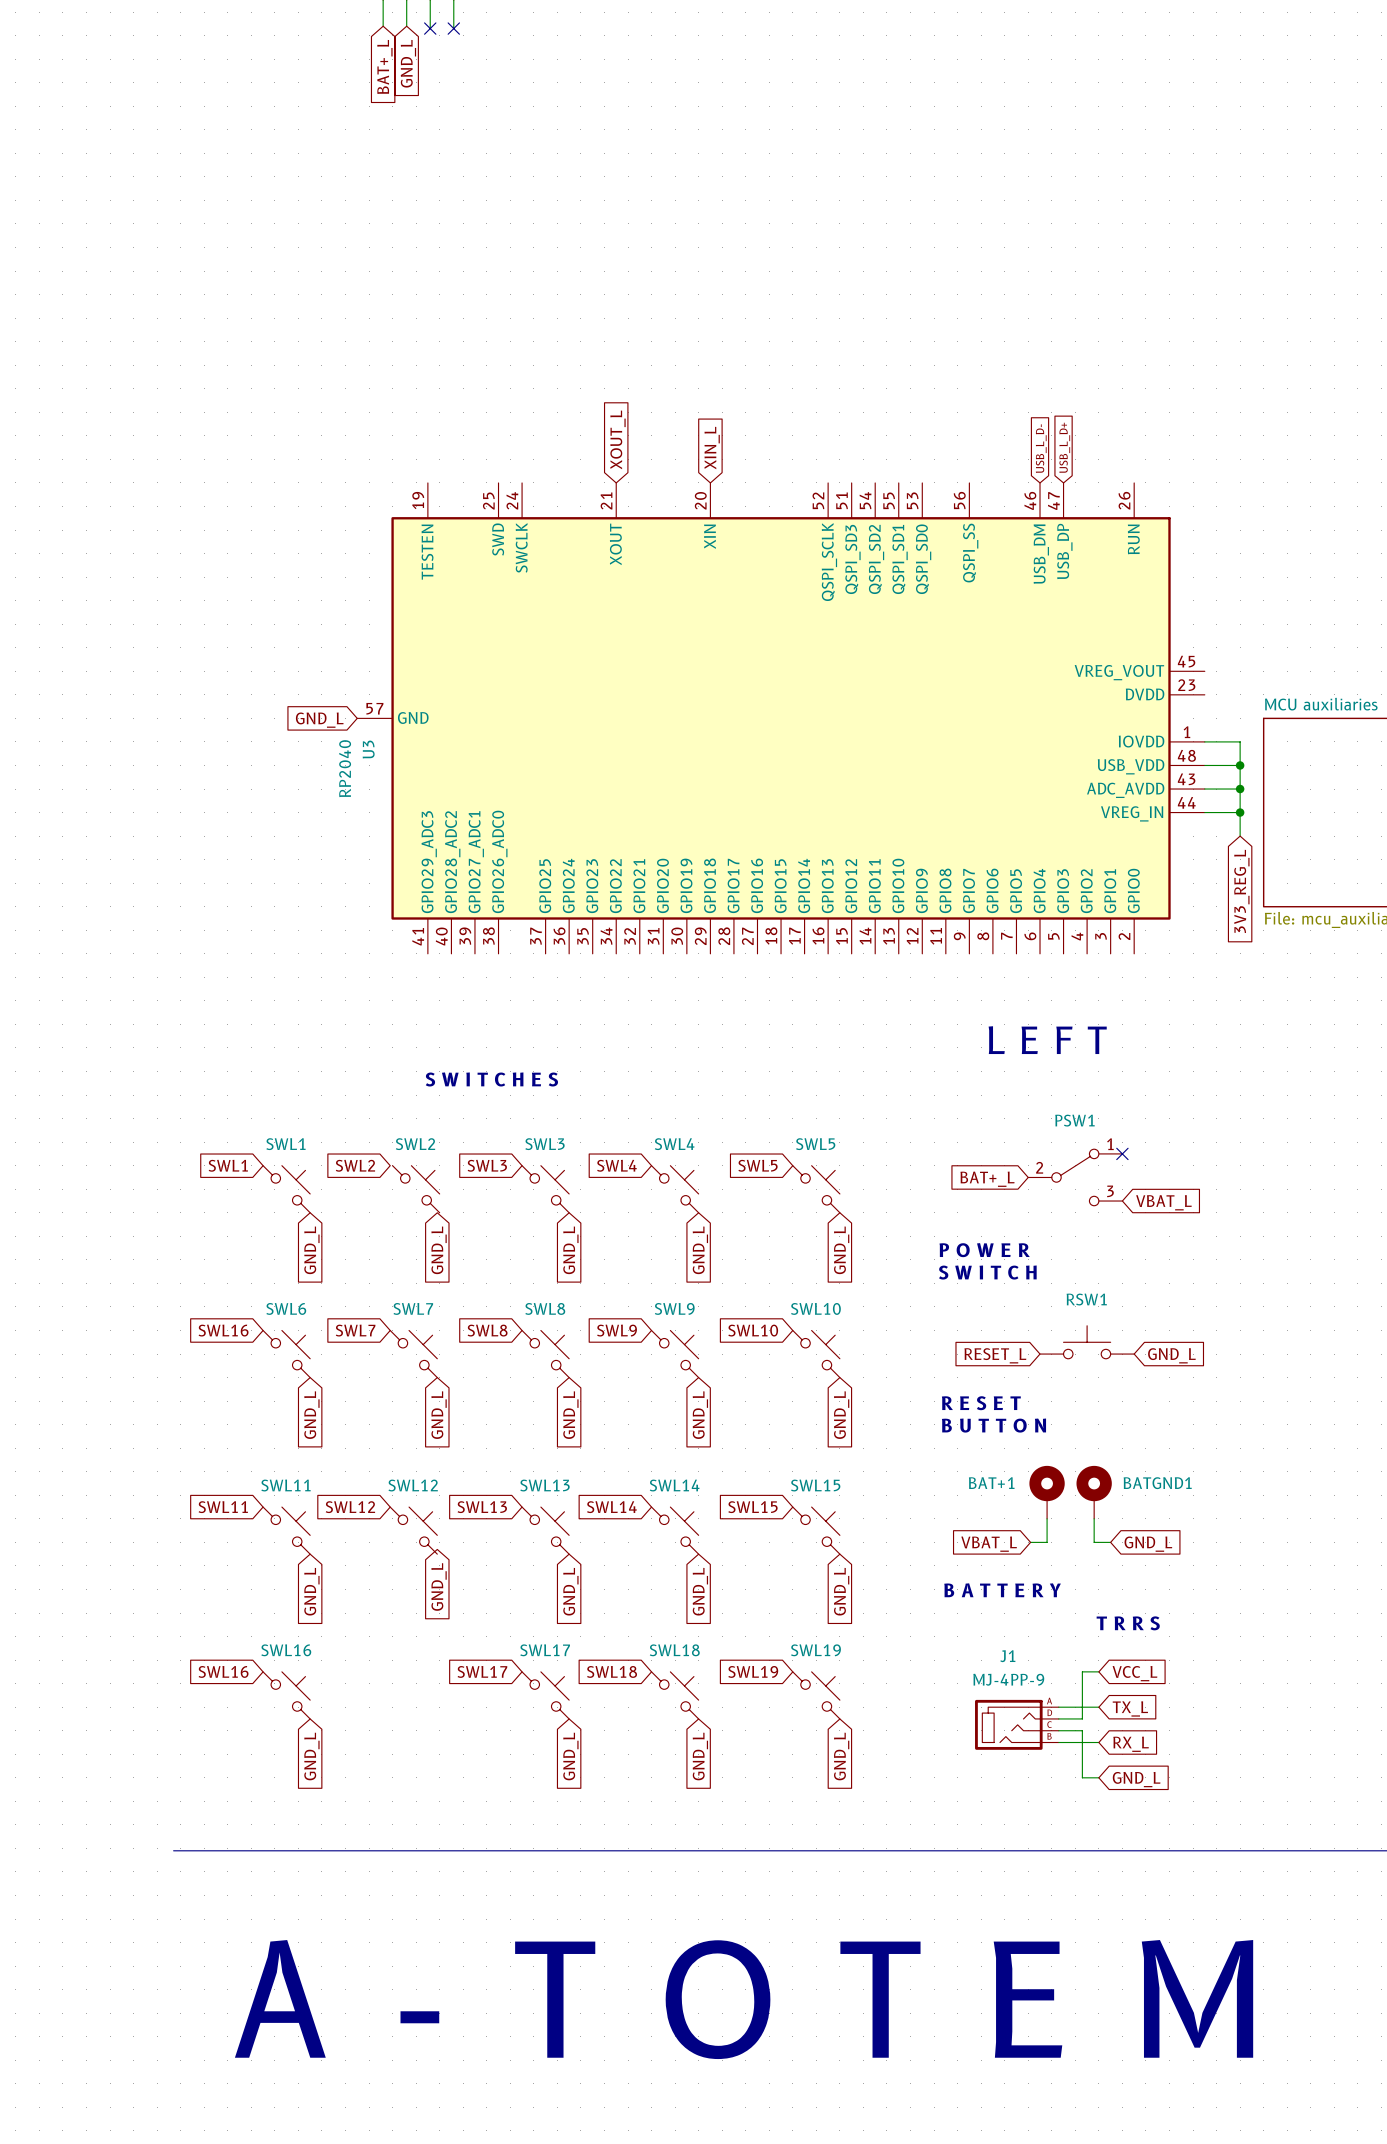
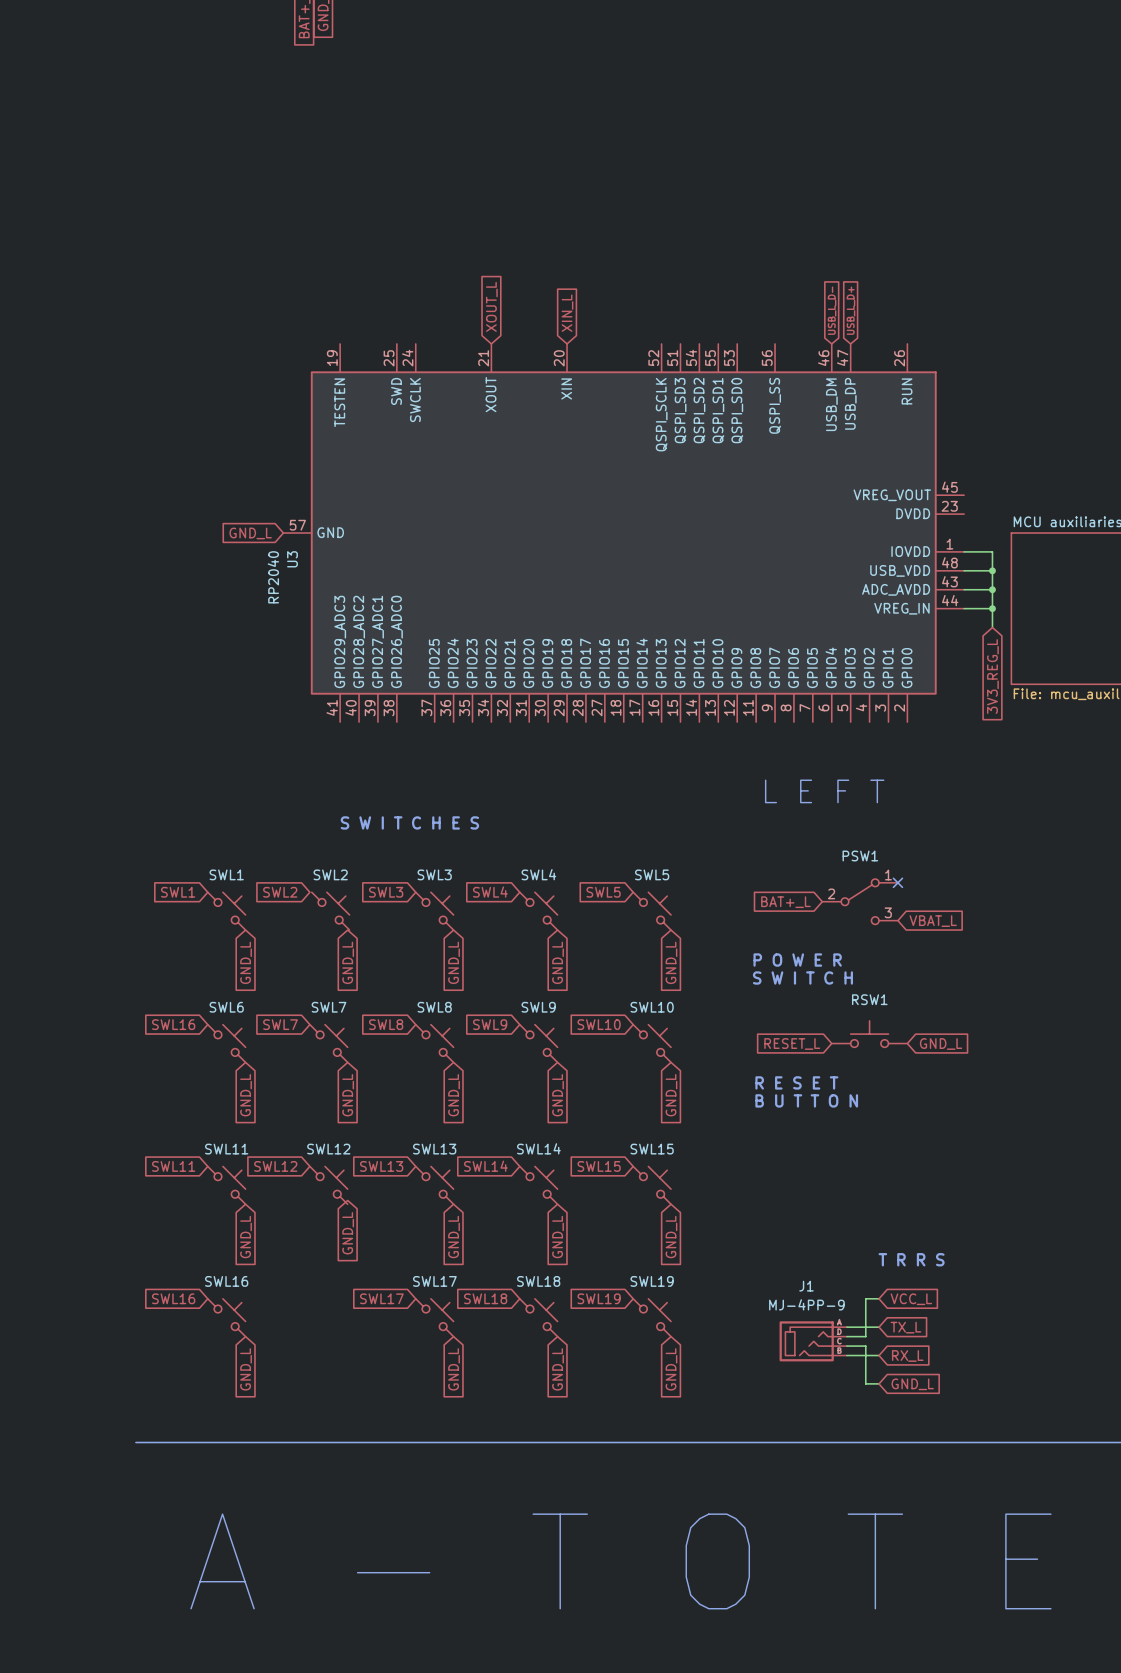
BAT+1: (1047, 1492) -> none
BATGND1: (1094, 1492) -> none
wire: (1047, 1518) (1047, 1542) (1030, 1542) -> none
wire: (1094, 1518) (1094, 1542) (1110, 1542) -> none
global label: VBAT_L (989, 1544) -> none
global label: GND_L (1148, 1544) -> none
text: B A T T E R Y (1002, 1590) -> none

